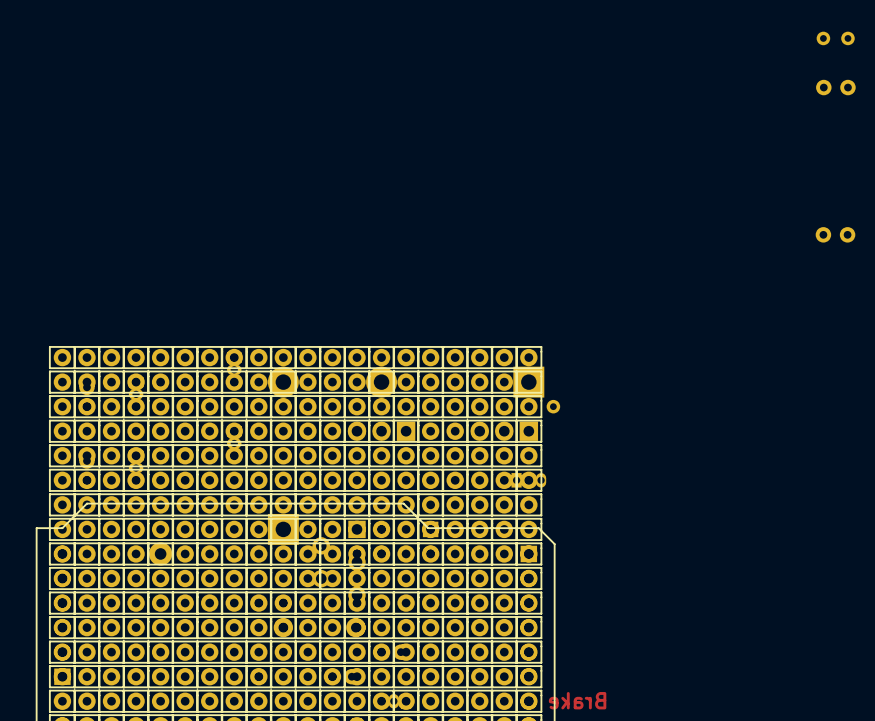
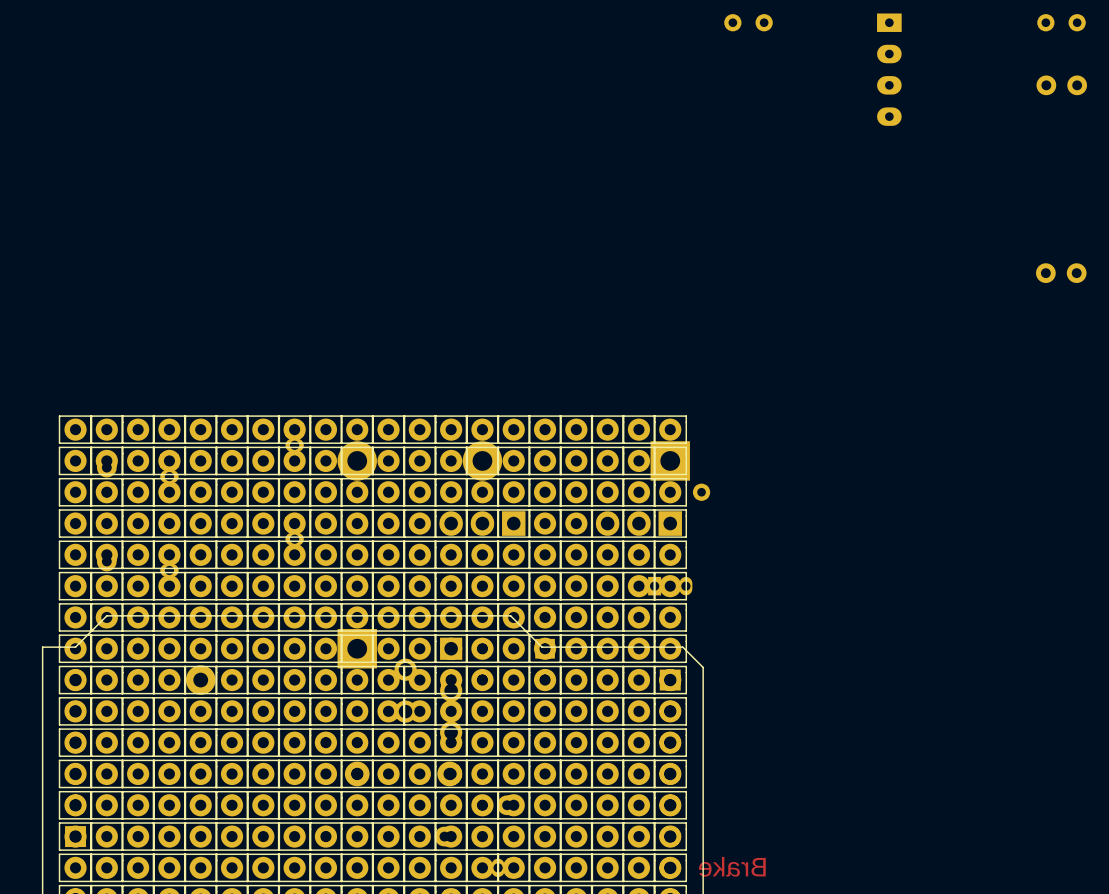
part: none -> (748, 22)
part: none -> (889, 69)

